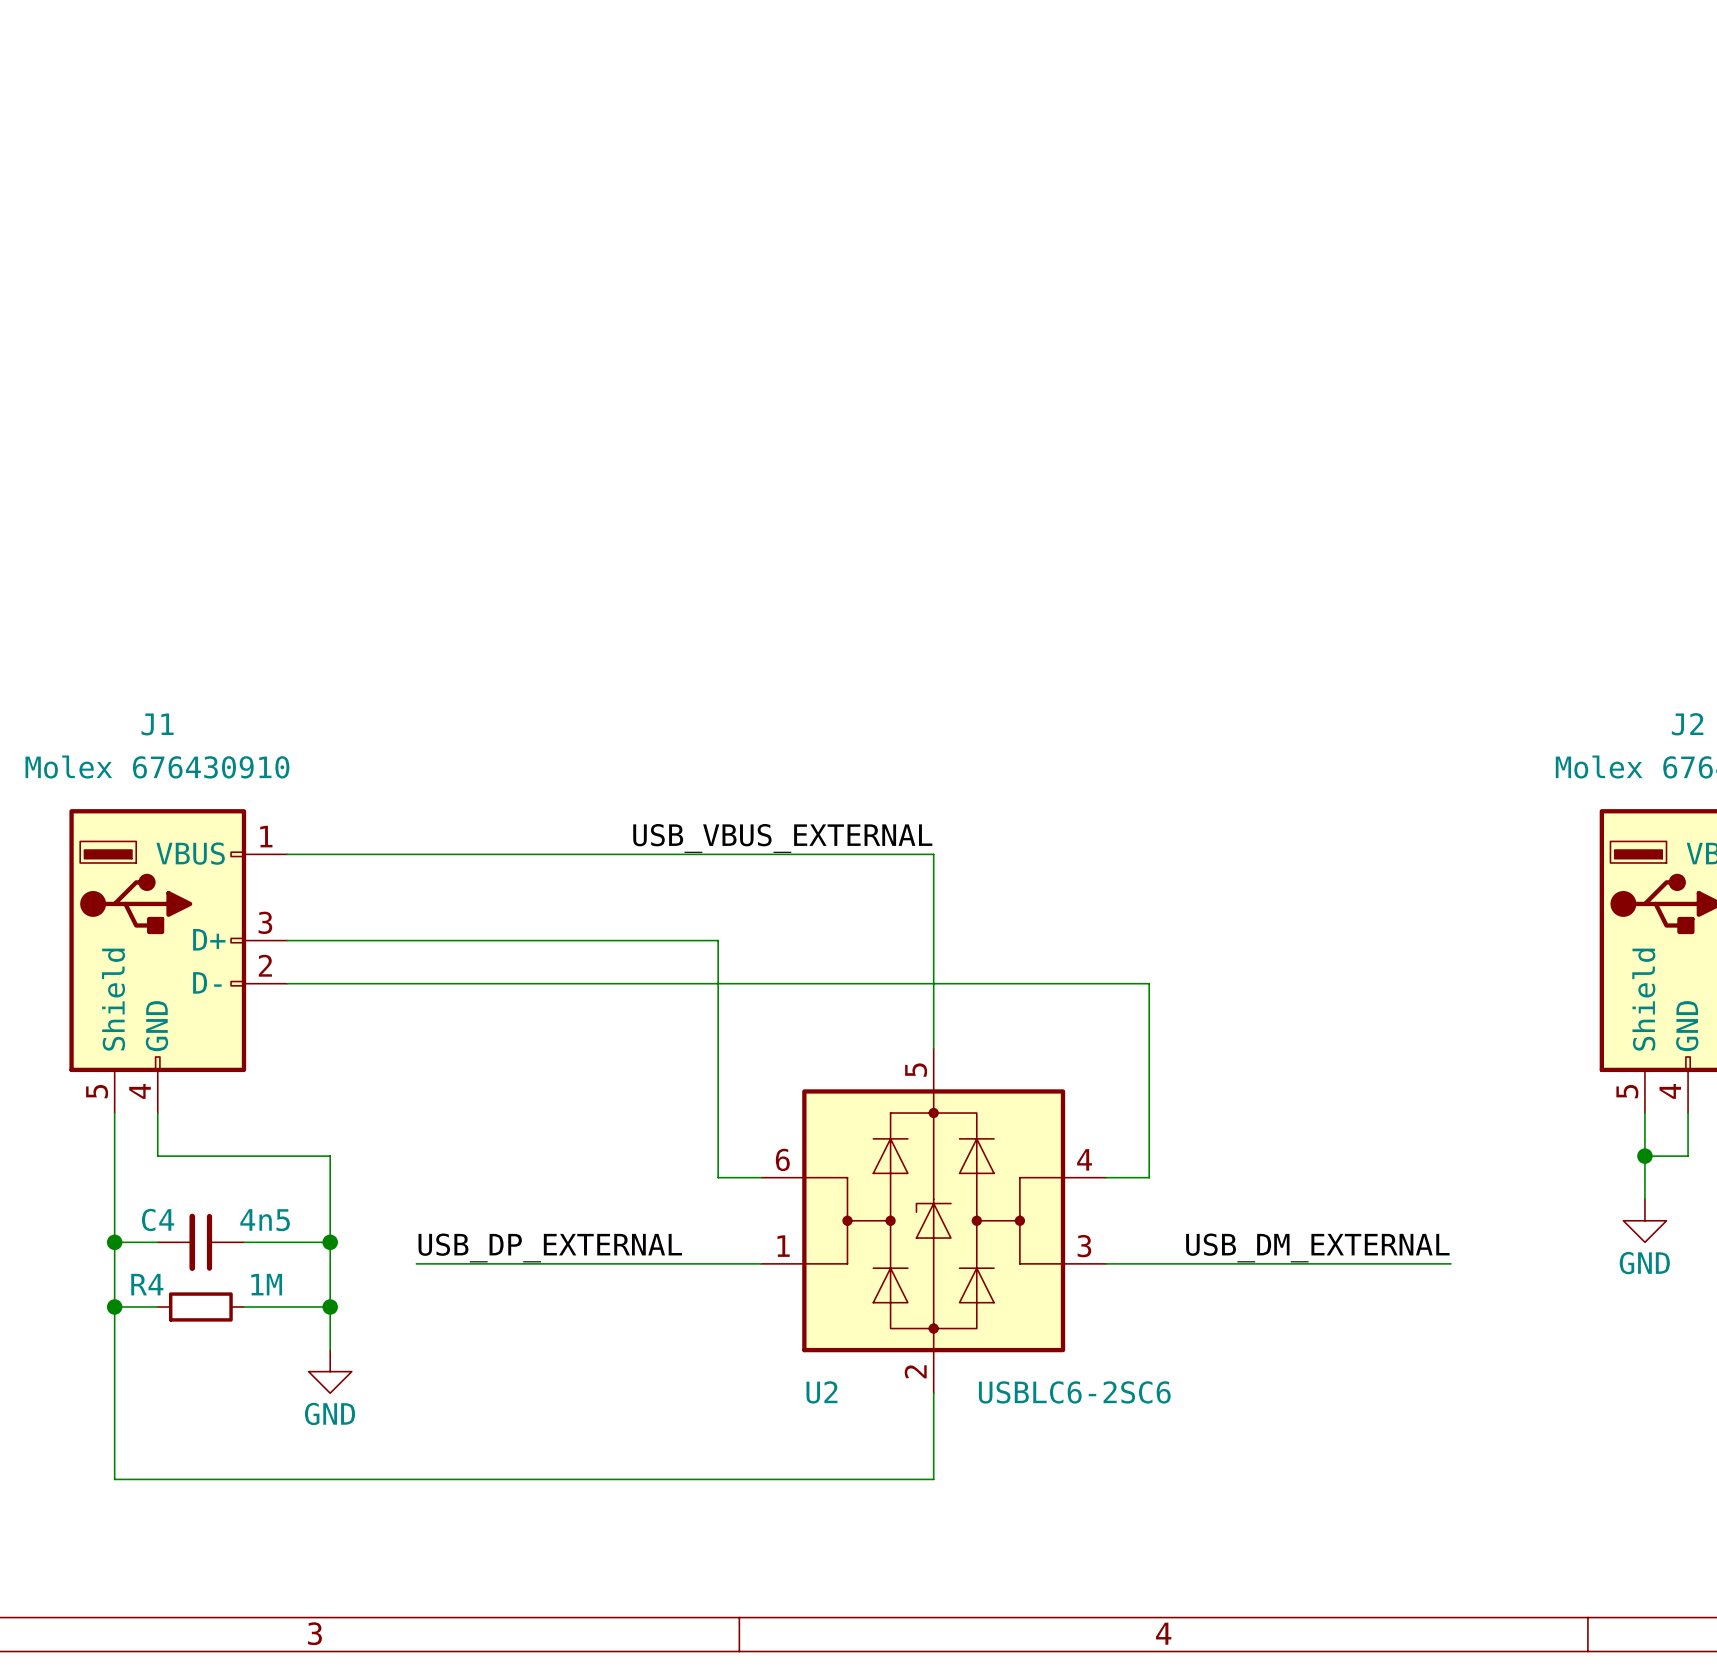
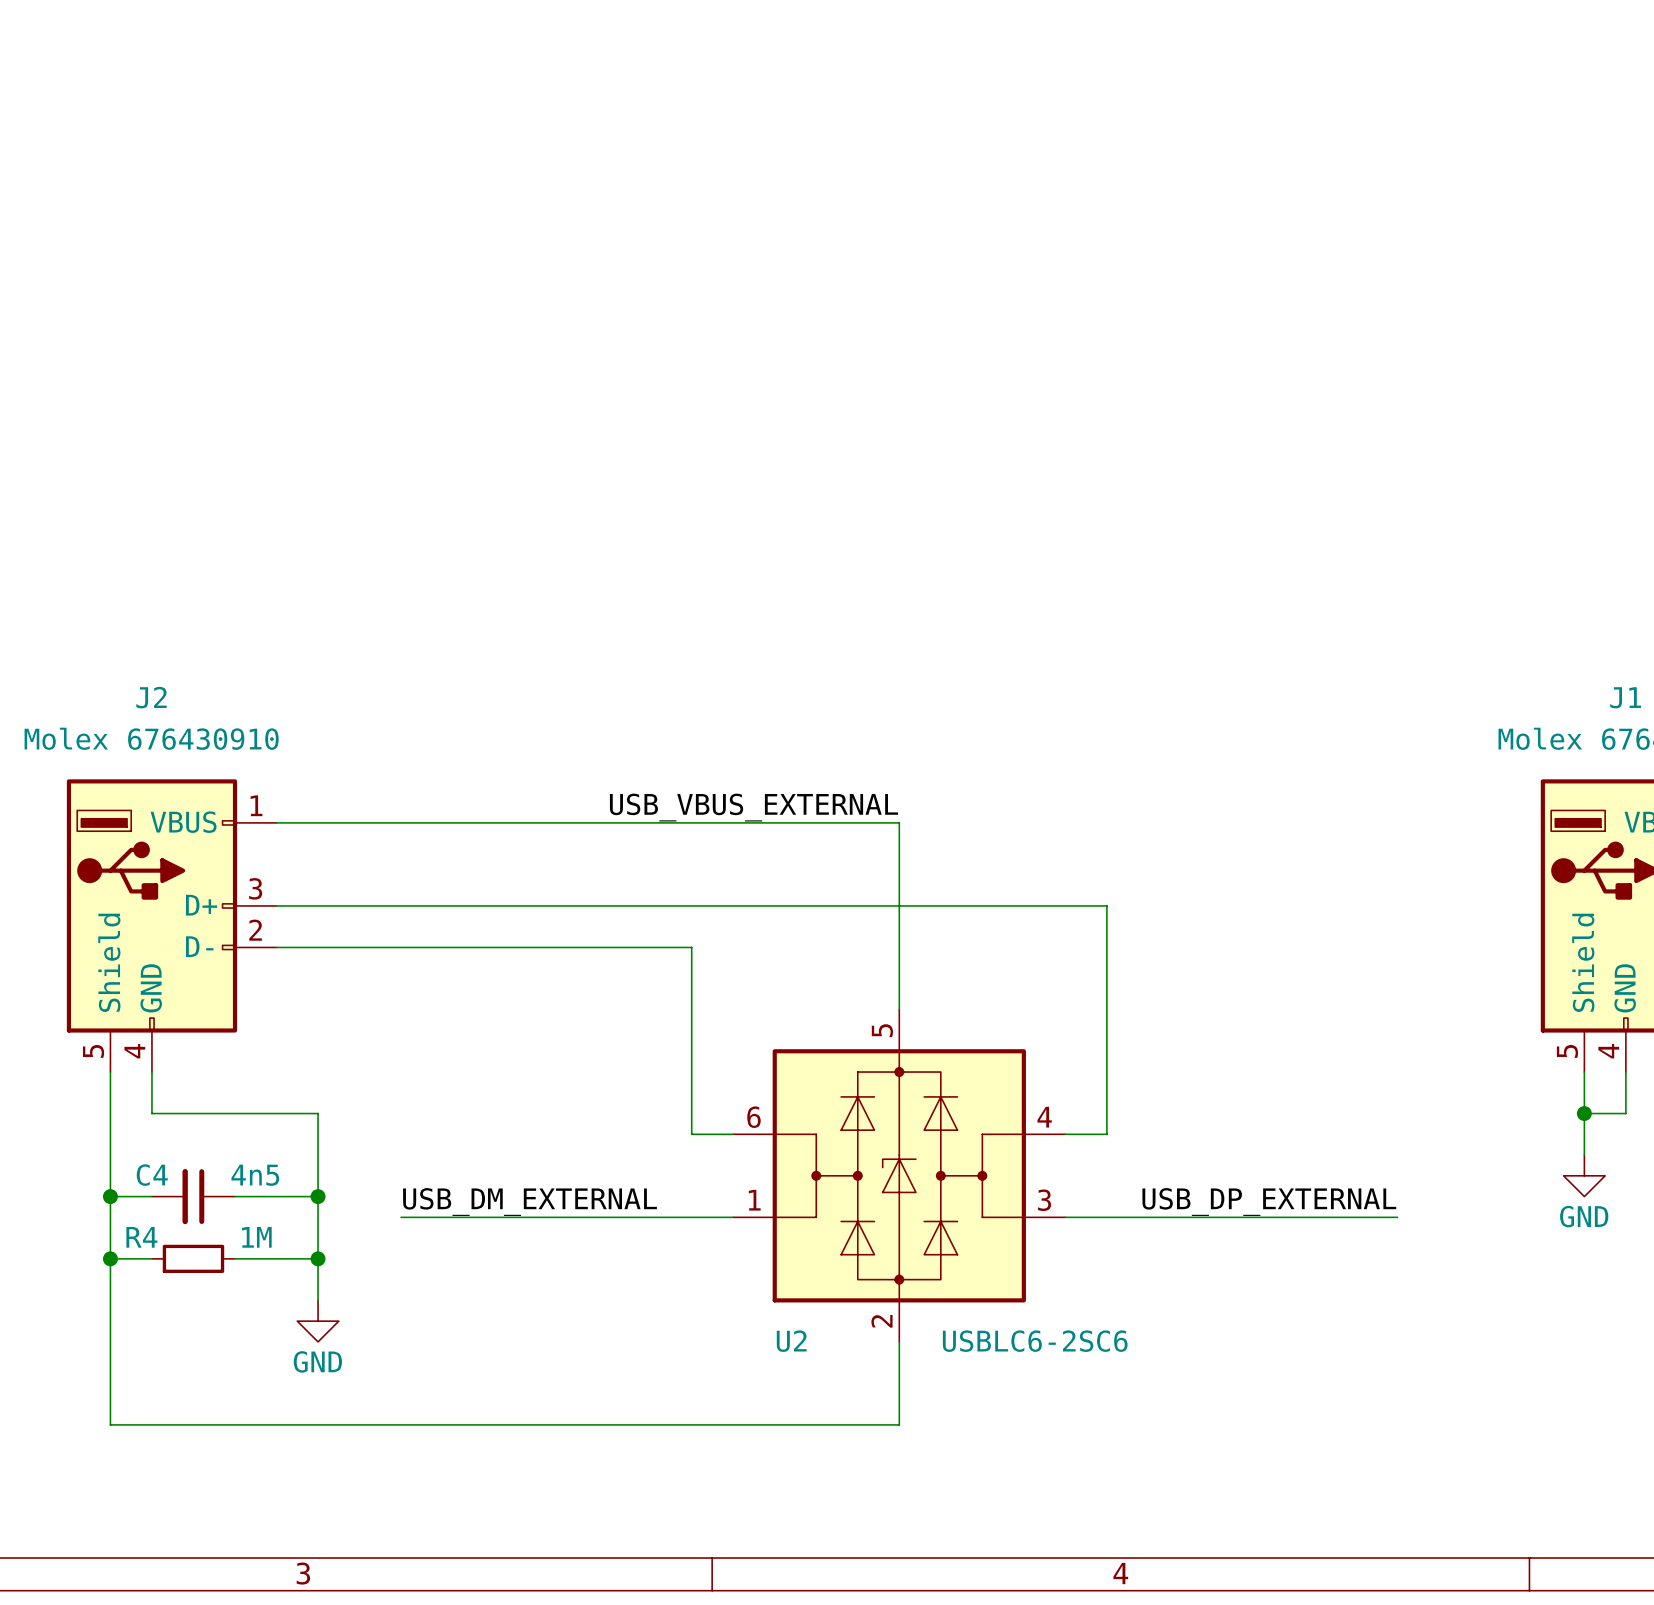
J1 name: J1 (157, 724) -> J2 (151, 697)
J2 name: J2 (1687, 724) -> J1 (1625, 697)
wire: (718, 940) (718, 983) (1149, 983) -> (691, 905) (1106, 905) (1106, 947)
label: USB_DP_EXTERNAL (550, 1247) -> USB_DM_EXTERNAL (530, 1201)
label: USB_DM_EXTERNAL (1317, 1247) -> USB_DP_EXTERNAL (1269, 1201)

